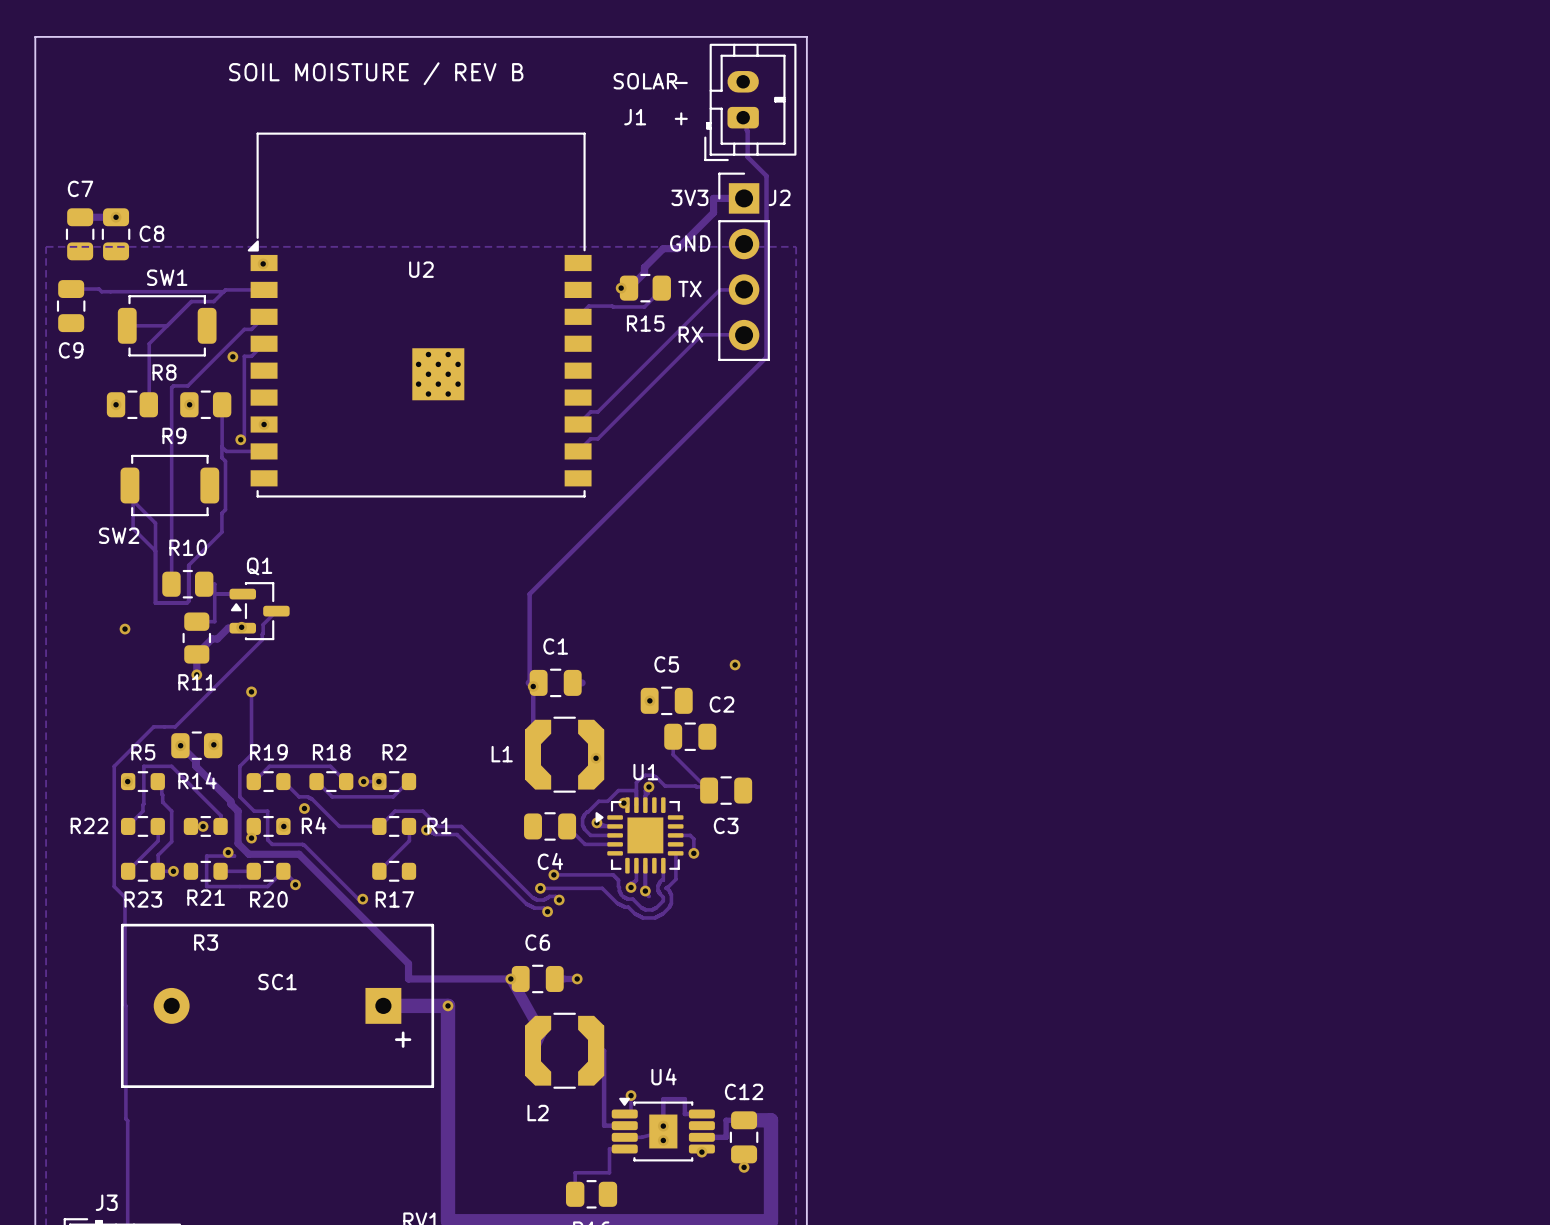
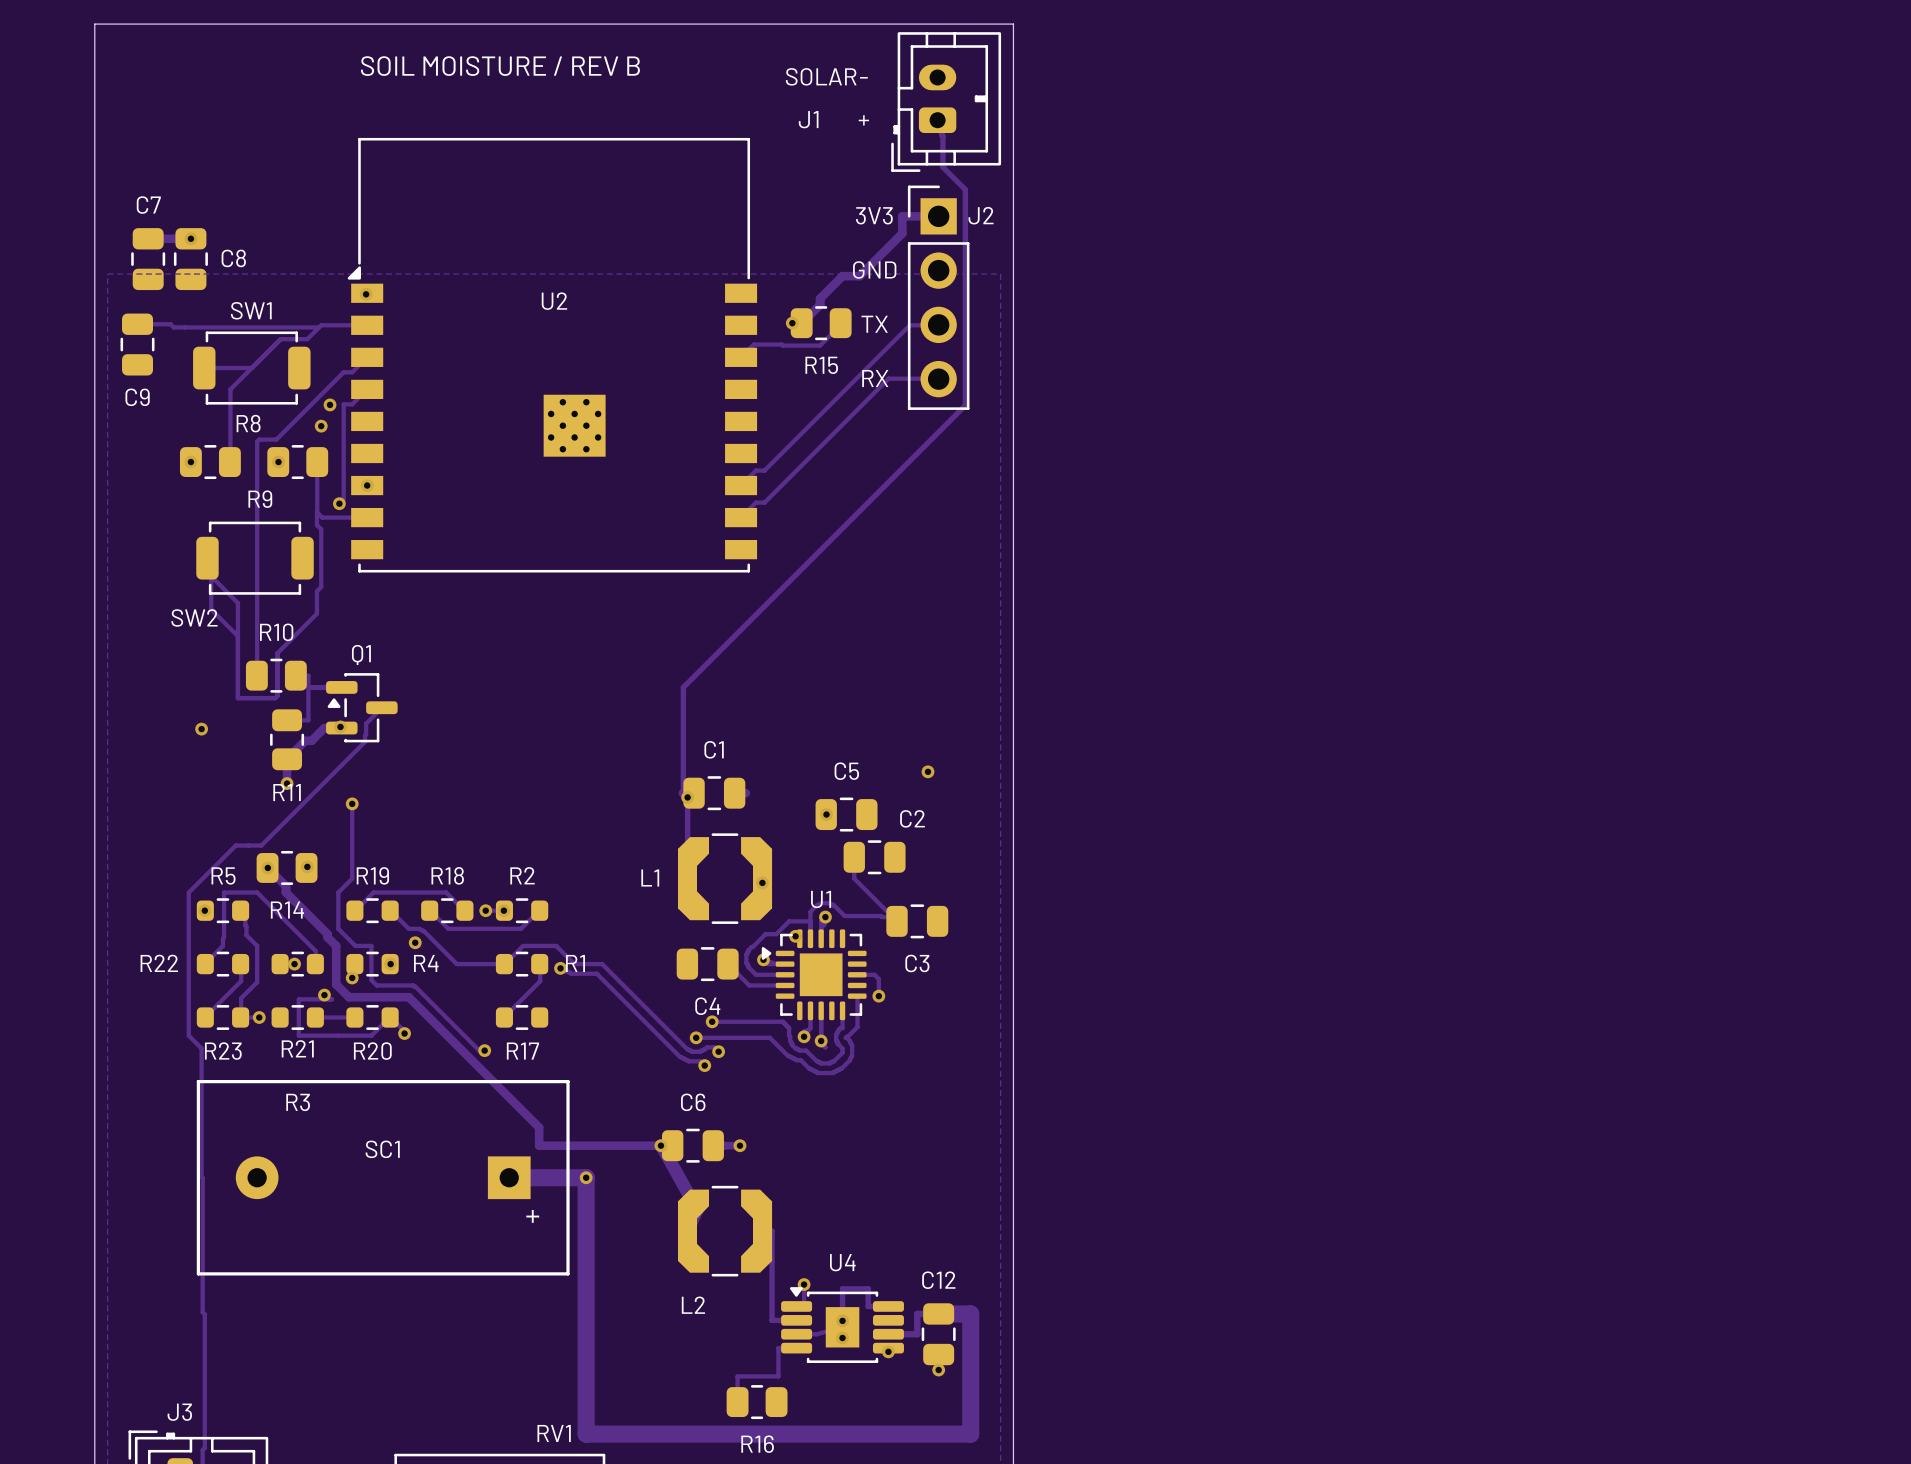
via: none -> (321, 426)

